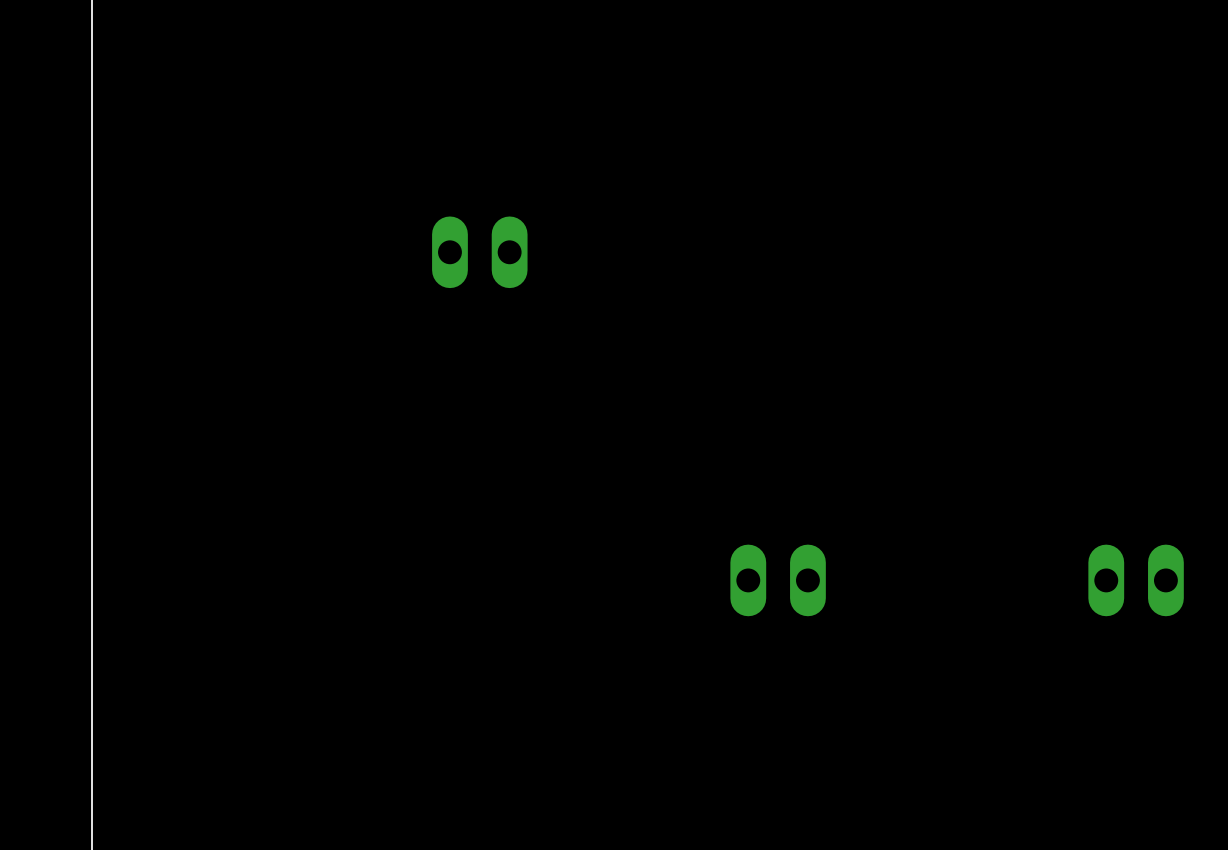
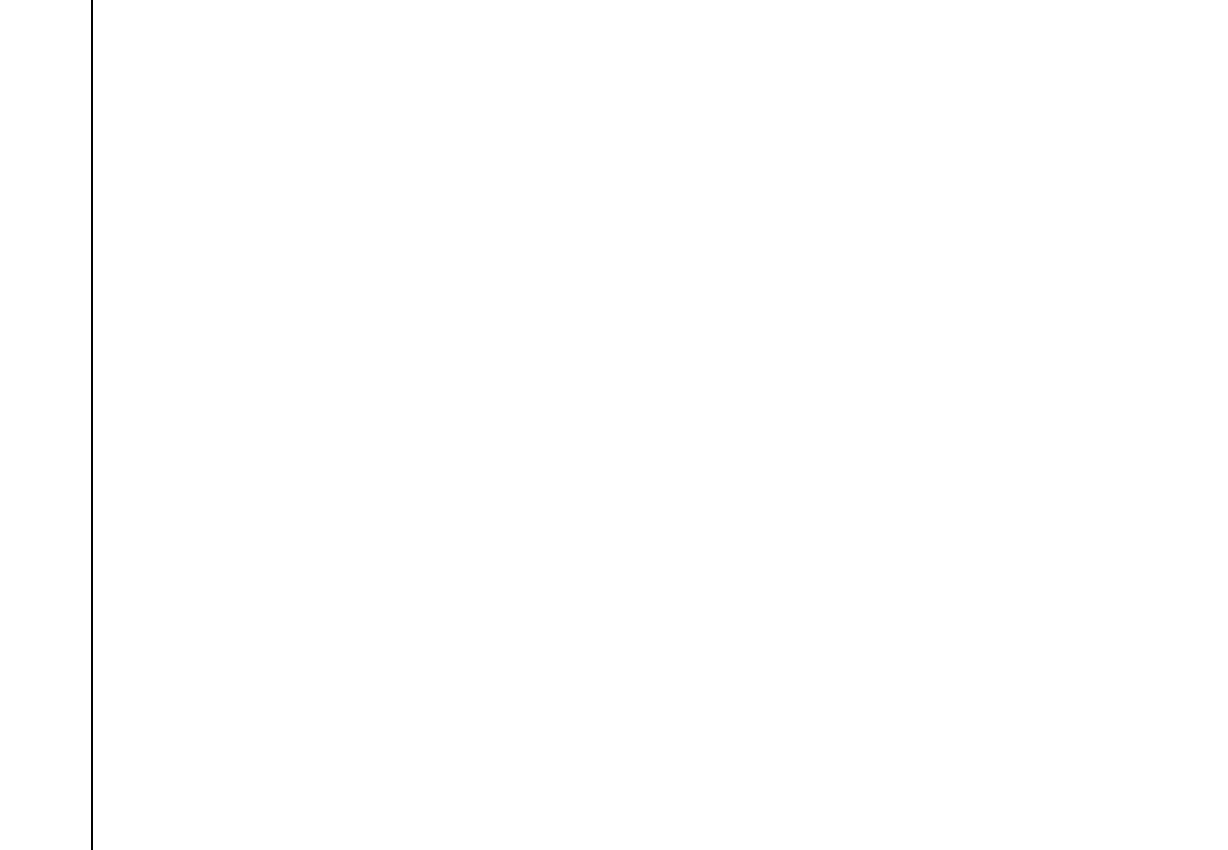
part: (479, 252) -> none
part: (778, 580) -> none
part: (1136, 580) -> none

